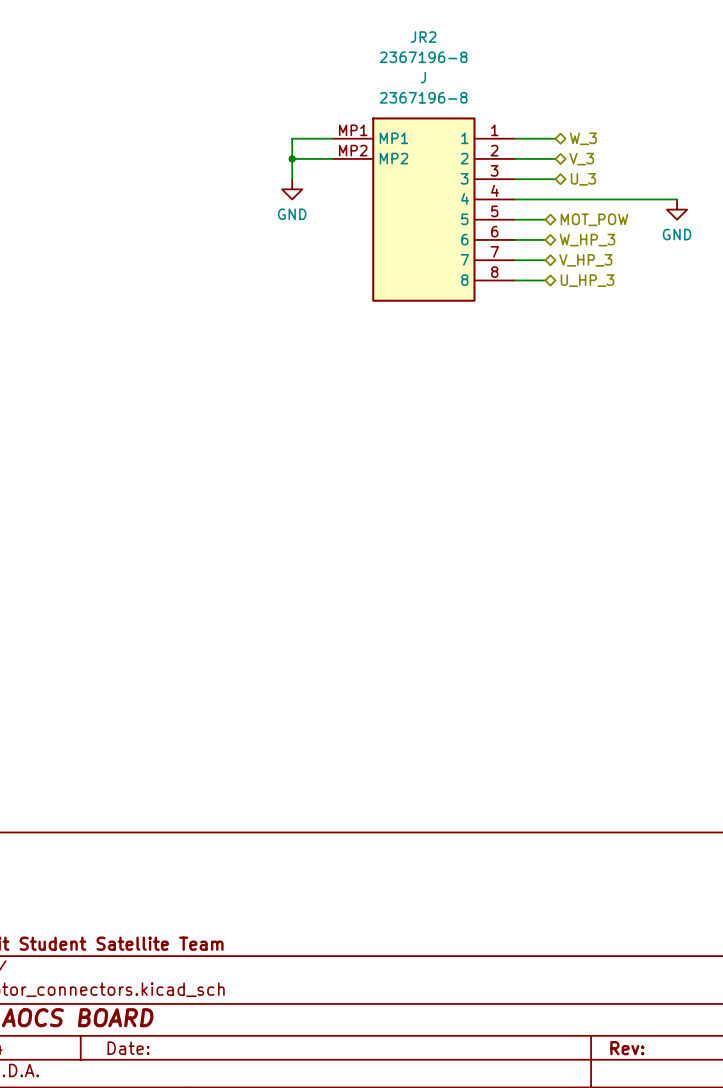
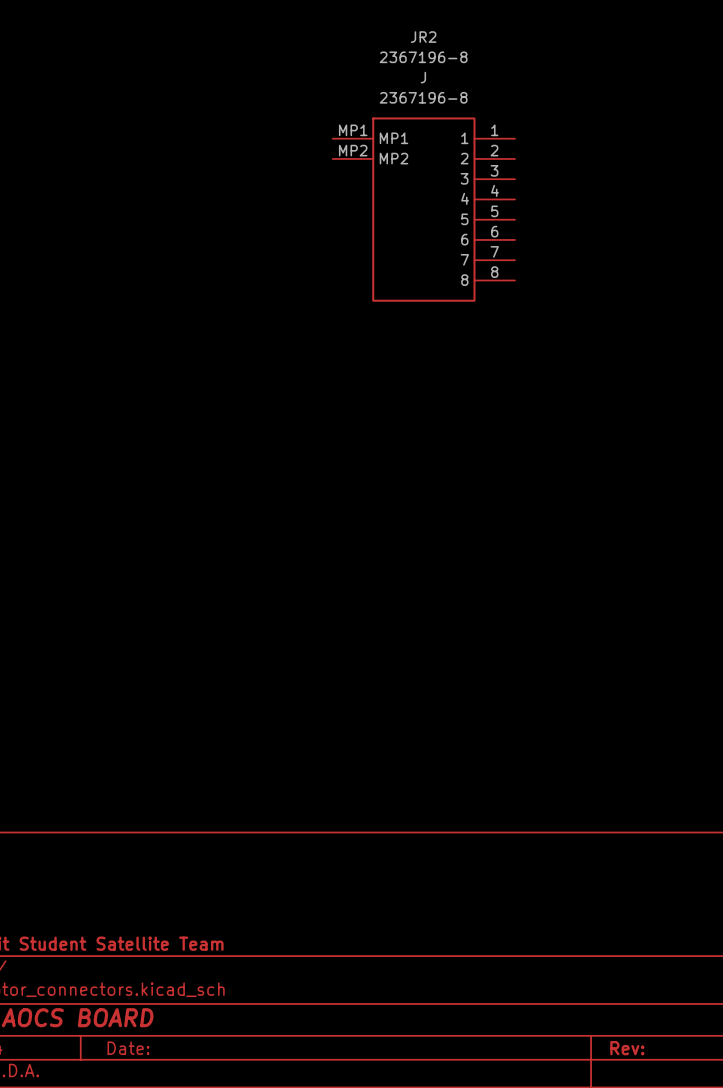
wire: (332, 138) (292, 138) (292, 179) -> none
wire: (515, 138) (555, 138) -> none
hierarchical label: W_3 (583, 138) -> none
wire: (292, 158) (332, 158) -> none
junction: (292, 158) -> none
wire: (515, 158) (555, 158) -> none
hierarchical label: V_3 (581, 159) -> none
wire: (515, 179) (555, 179) -> none
hierarchical label: U_3 (583, 179) -> none
power symbol: GND (292, 189) -> none
wire: (515, 199) (677, 199) -> none
power symbol: GND (677, 209) -> none
wire: (515, 219) (545, 219) -> none
hierarchical label: MOT_POW (594, 219) -> none
wire: (515, 239) (545, 239) -> none
hierarchical label: W_HP_3 (587, 240) -> none
wire: (515, 260) (545, 260) -> none
hierarchical label: V_HP_3 (585, 260) -> none
wire: (515, 280) (545, 280) -> none
hierarchical label: U_HP_3 (587, 280) -> none

